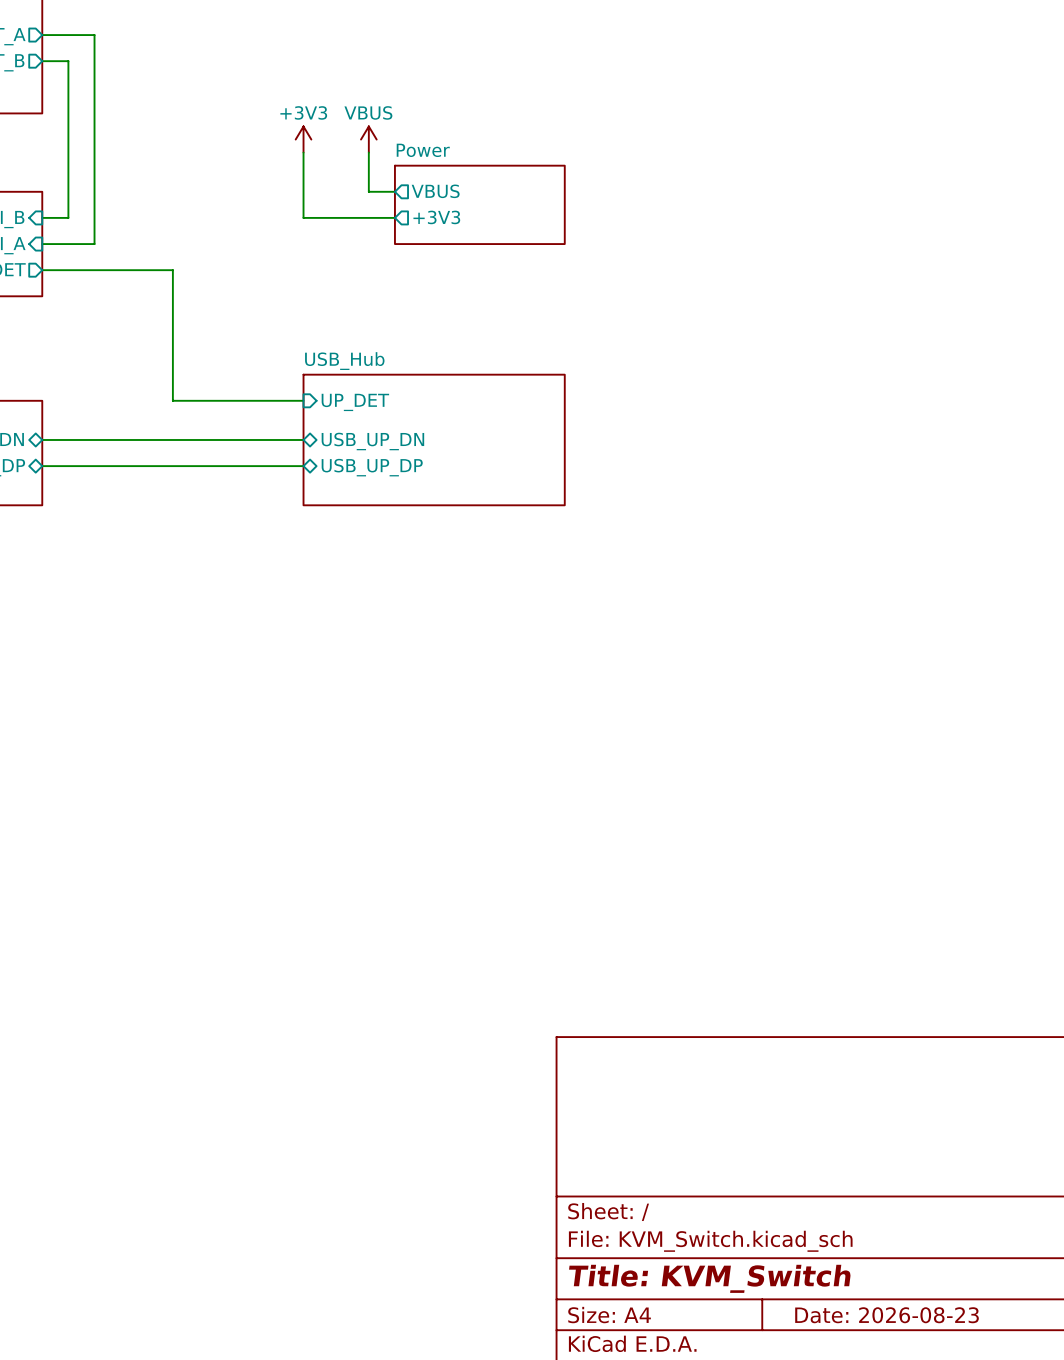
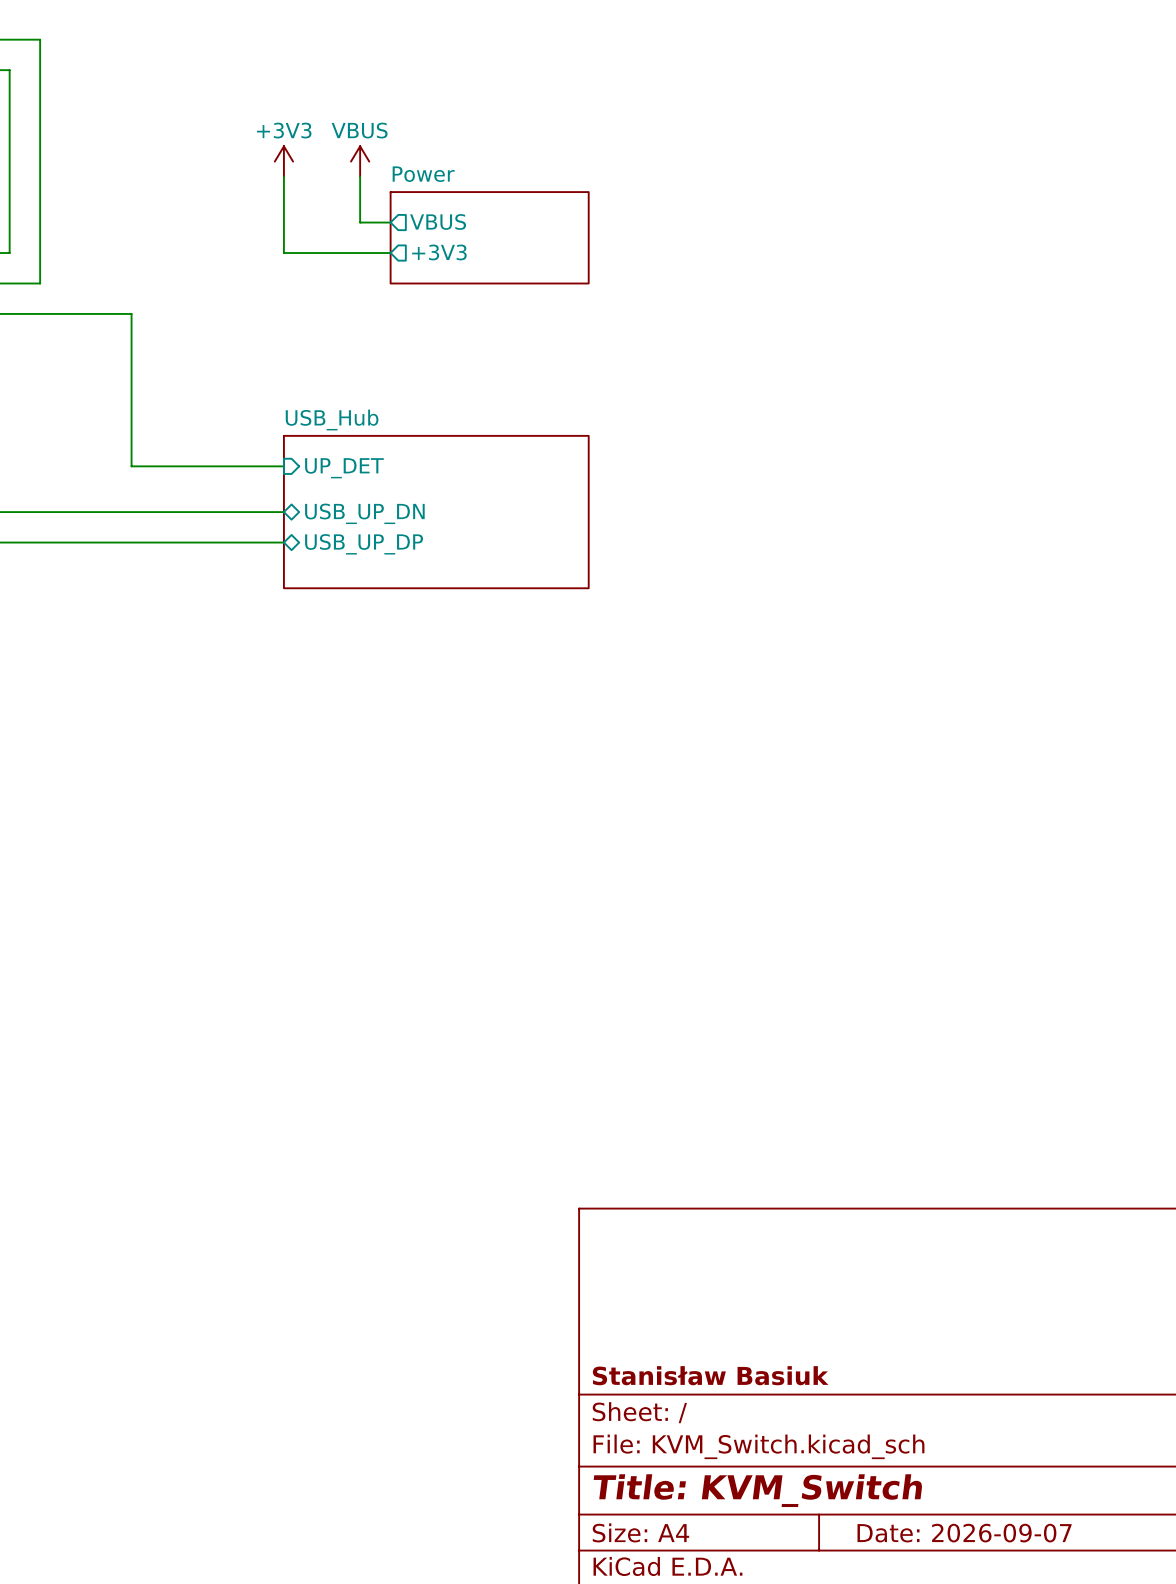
title block: none -> Stanisław Basiuk (710, 1375)
title block: Date: 2026-08-23 (887, 1315) -> Date: 2026-09-07 (964, 1533)

